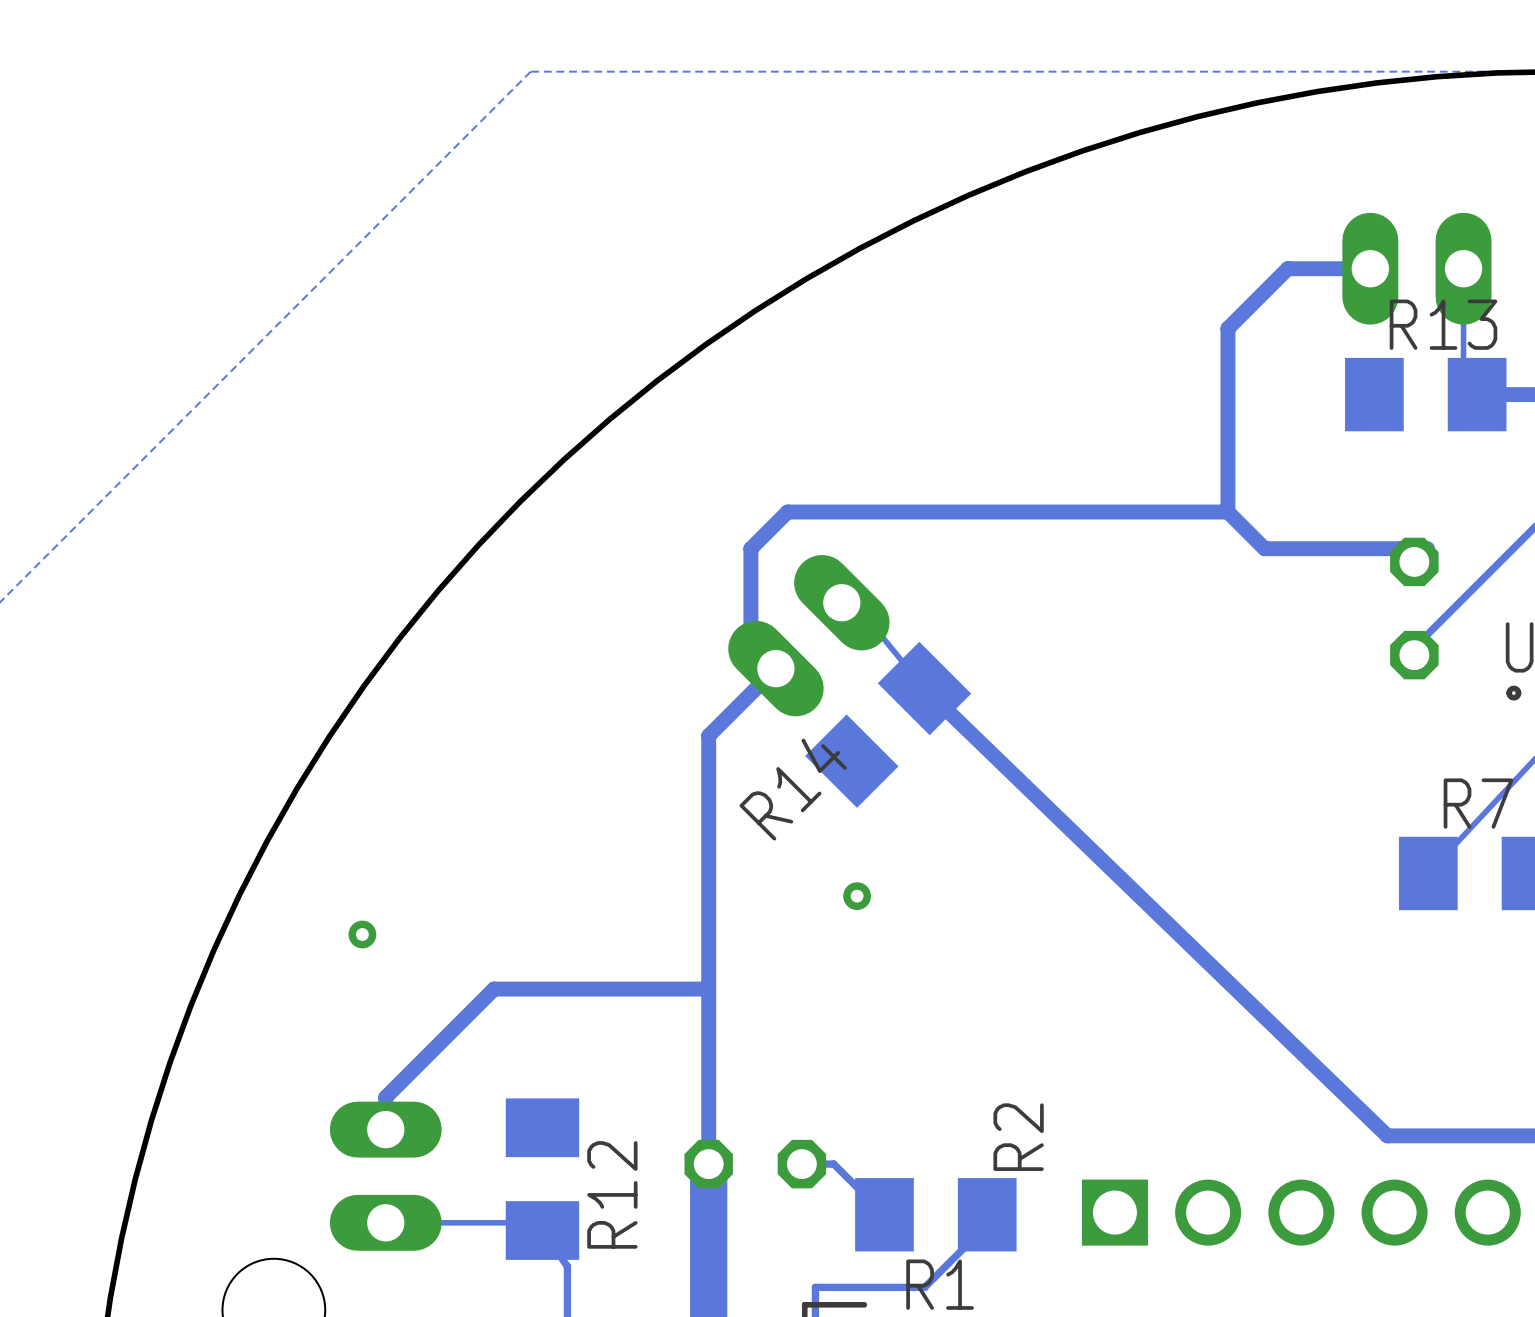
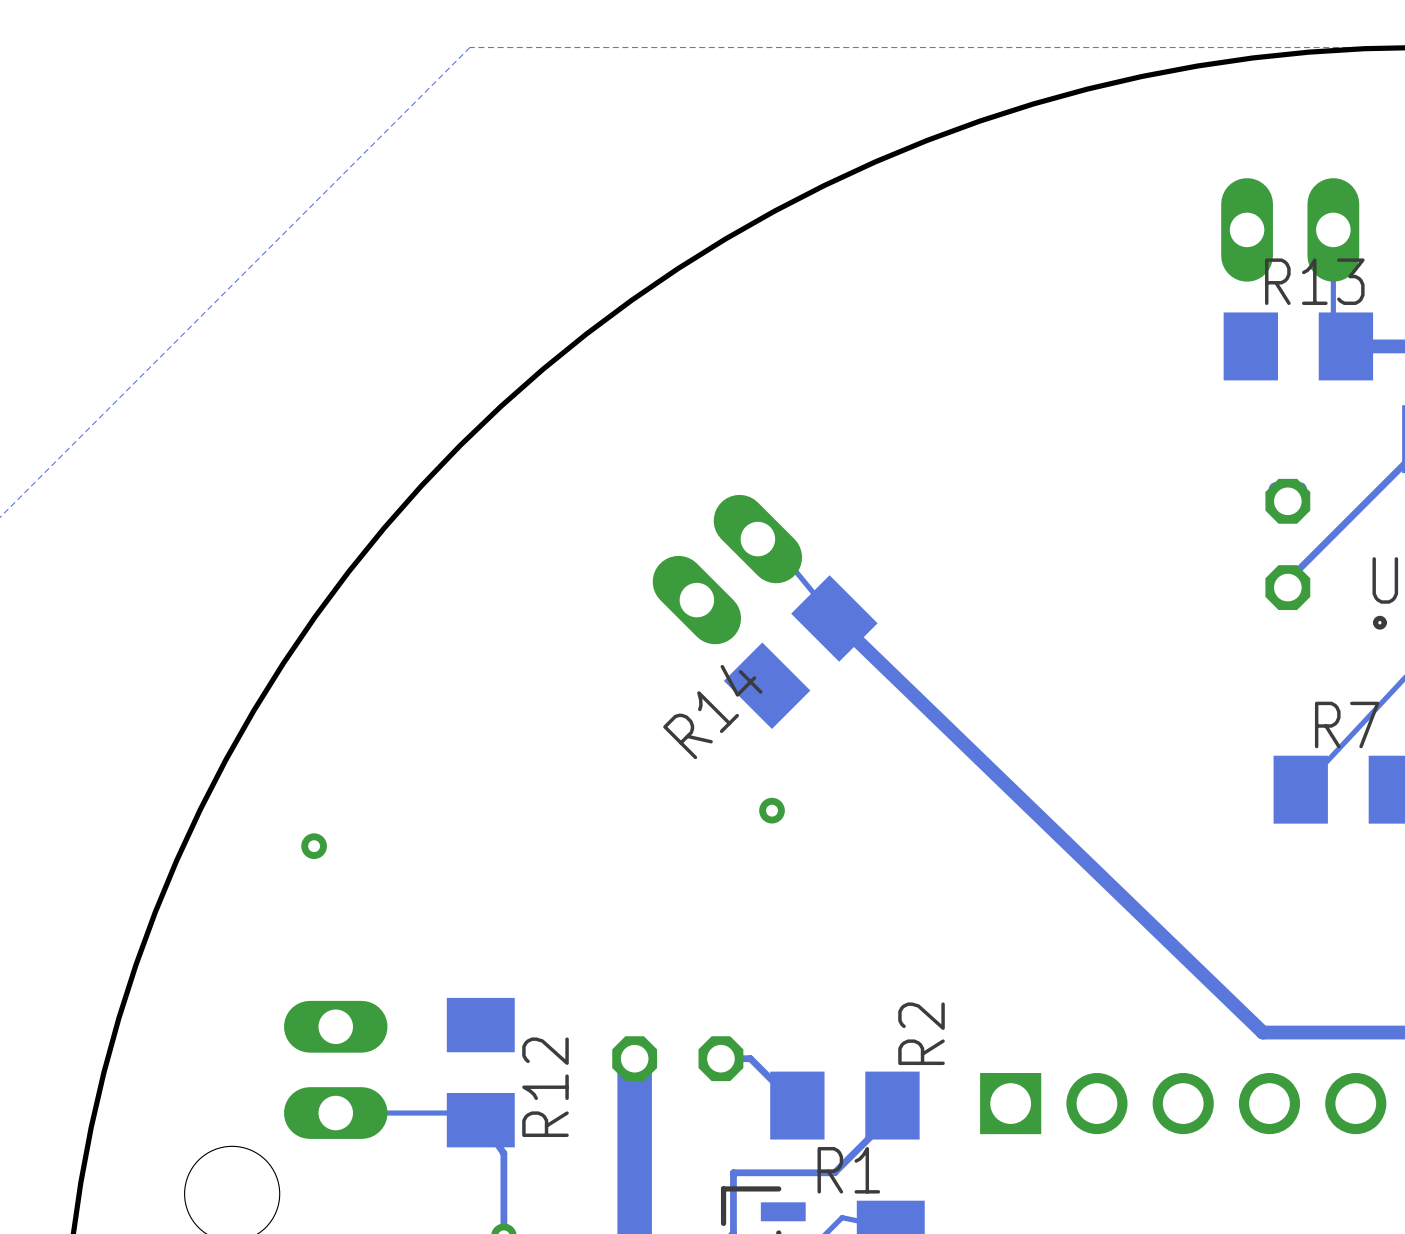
track: (1370, 268) (1287, 268) (1227, 328) (1227, 512) -> none
track: (1227, 512) (1264, 548) (1401, 548) -> none
track: (1227, 512) (787, 512) (750, 548) (750, 658) (760, 668) (775, 668) (708, 735) (708, 1164) -> none
track: (708, 989) (494, 989) (385, 1097) (385, 1129) -> none

